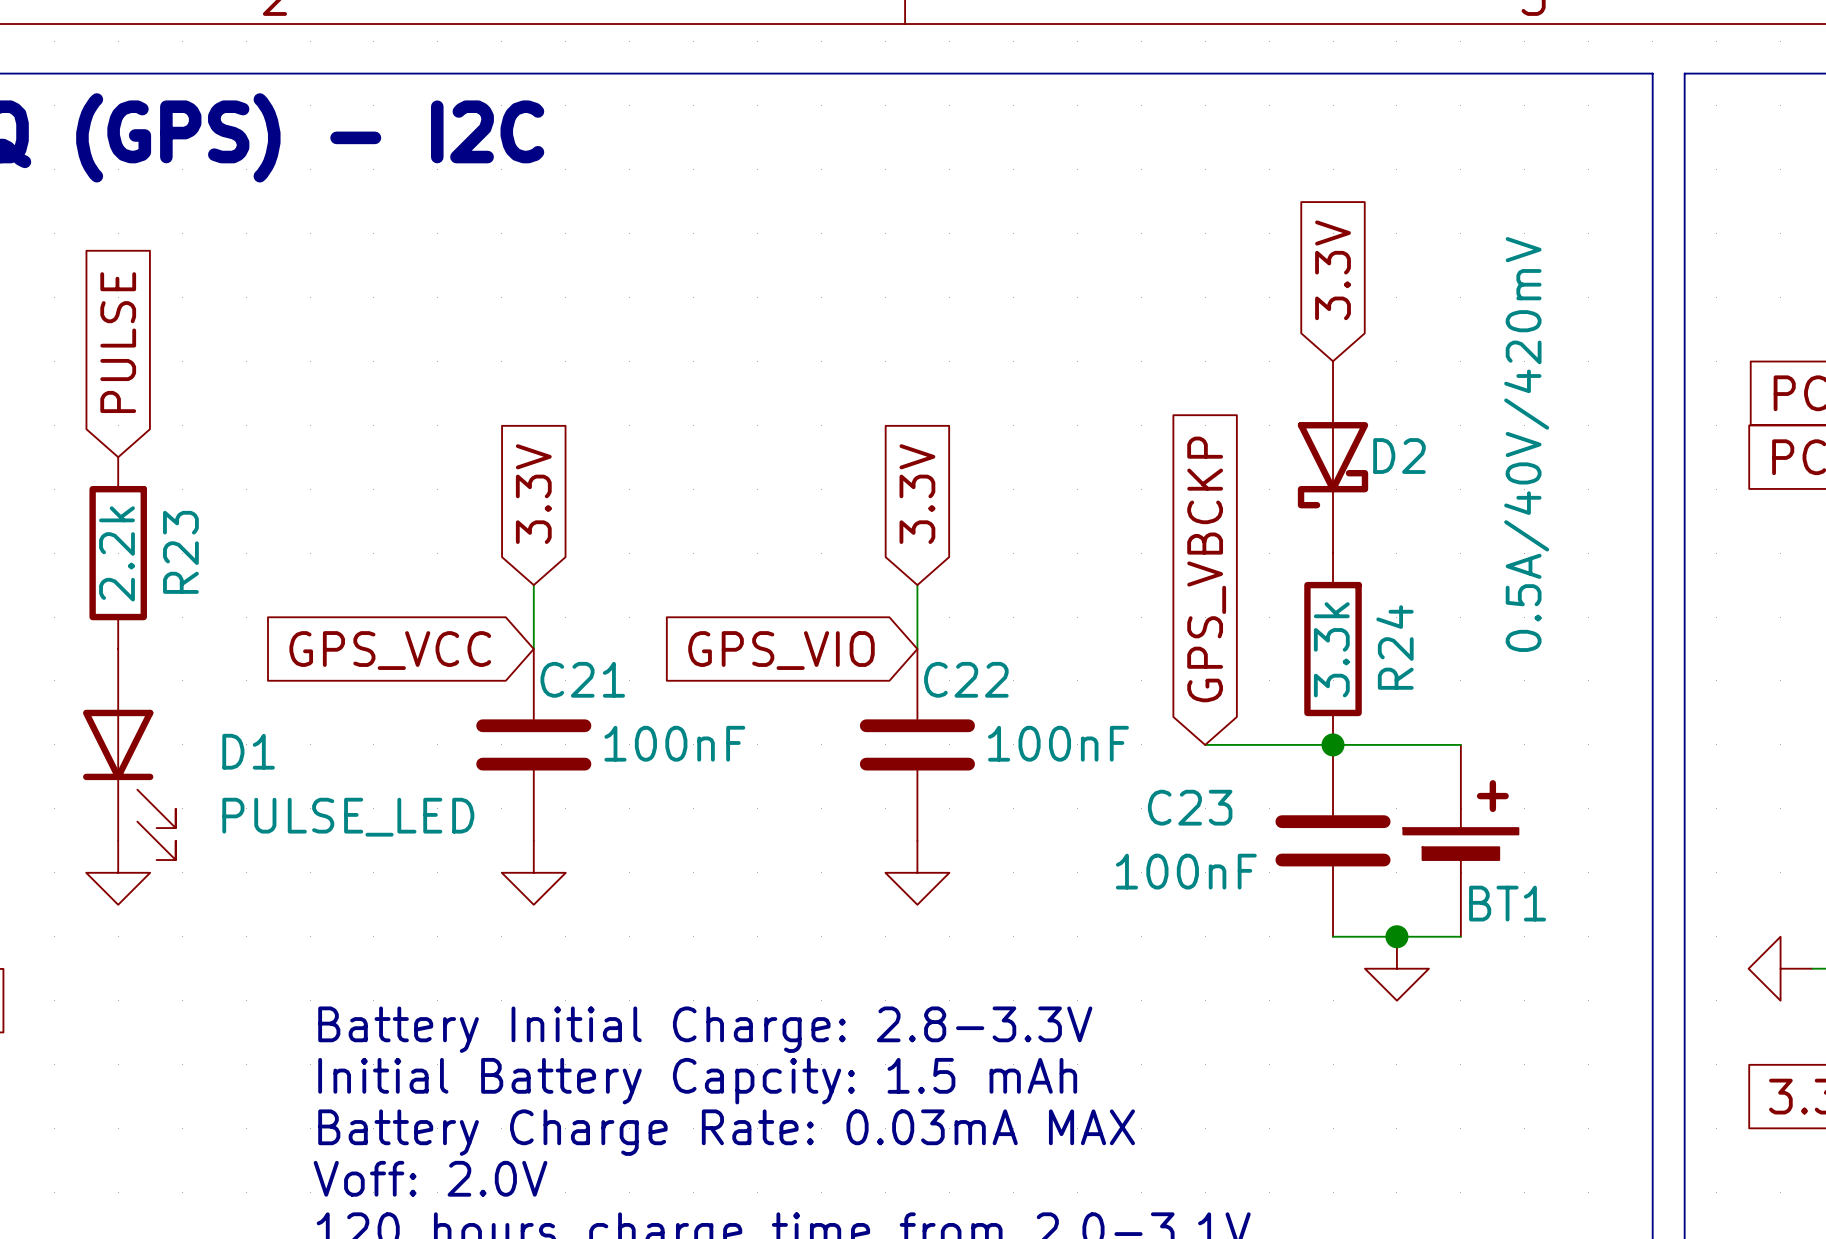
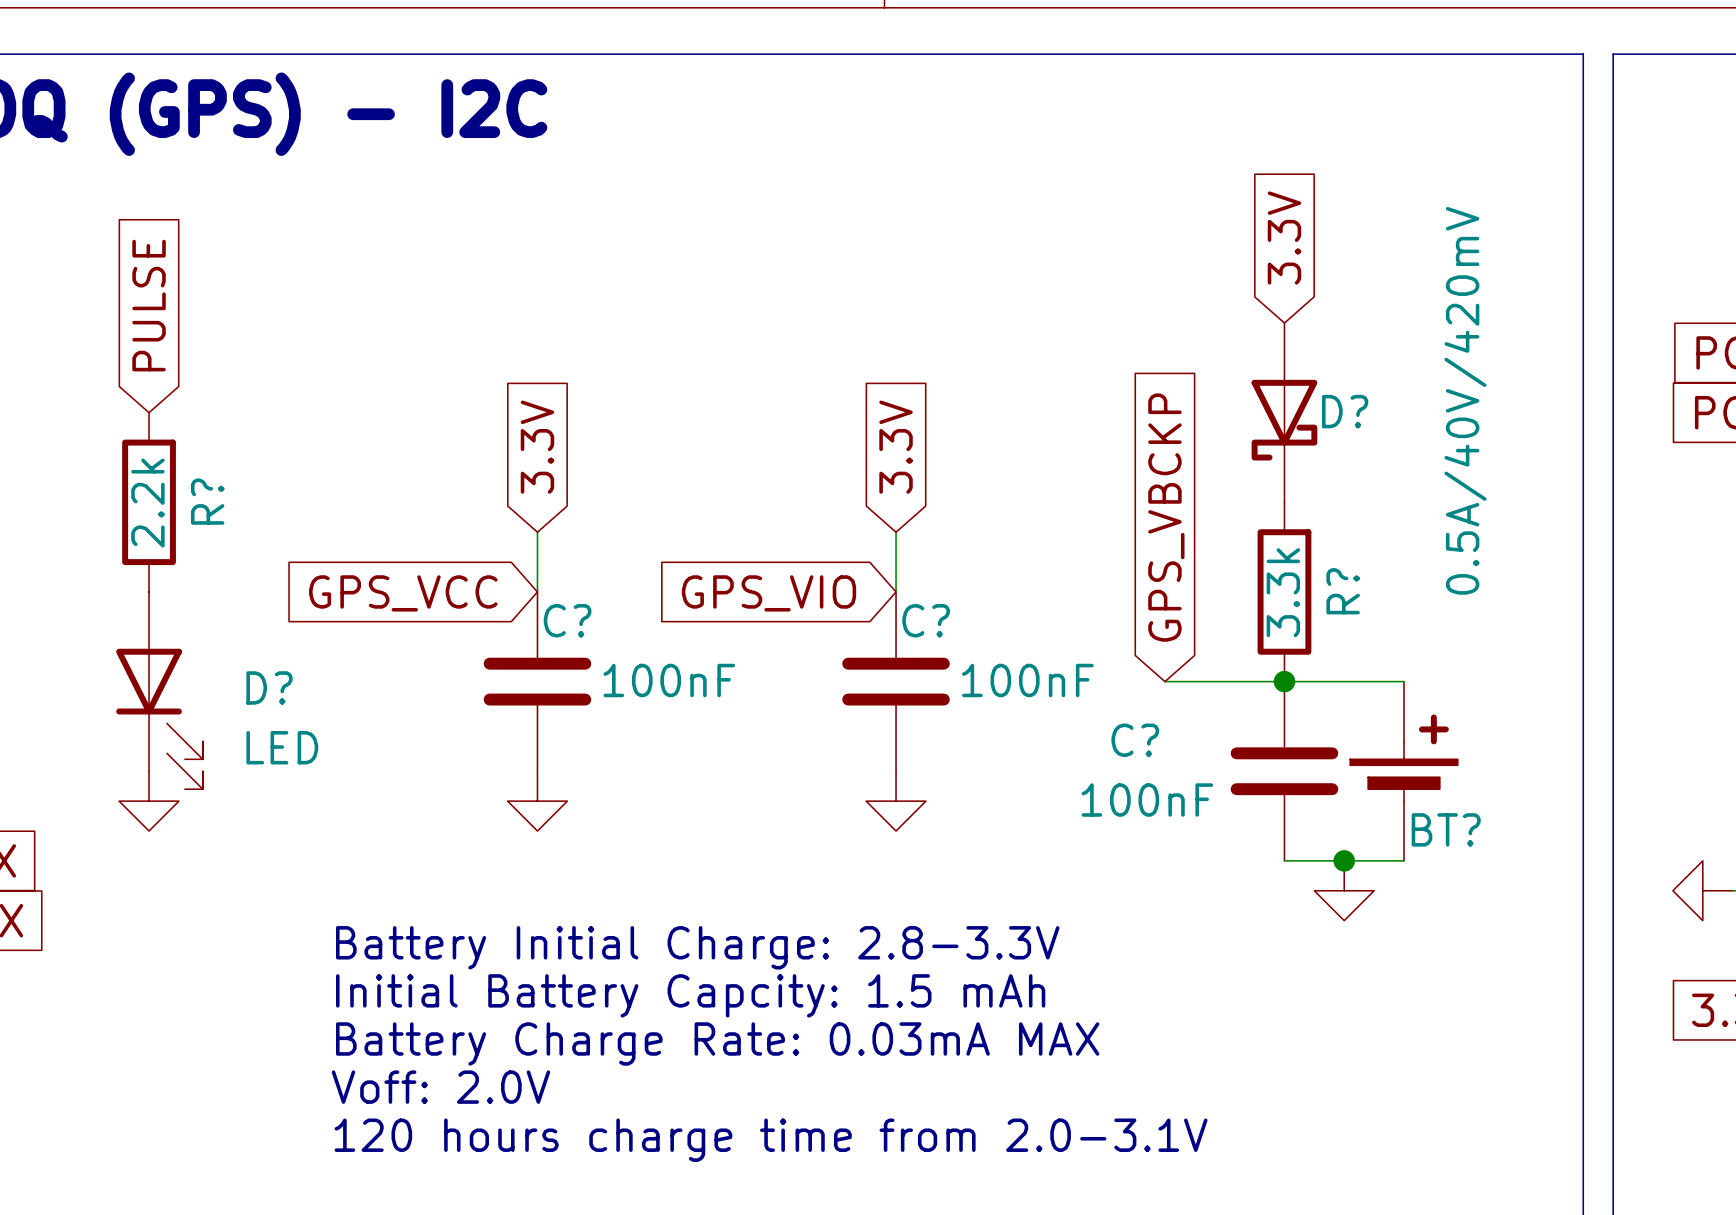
D2 name: D2 (1399, 456) -> D? (1345, 411)
R23 name: R23 (180, 552) -> R? (207, 501)
R24 name: R24 (1394, 647) -> R? (1343, 591)
C21 name: C21 (582, 679) -> C? (567, 620)
C22 name: C22 (966, 679) -> C? (926, 620)
D1 name: D1 (248, 751) -> D? (269, 687)
C23 name: C23 (1190, 807) -> C? (1135, 740)
D1 value: PULSE_LED (348, 817) -> LED (282, 747)
BT1 name: BT1 (1507, 903) -> BT? (1446, 829)

